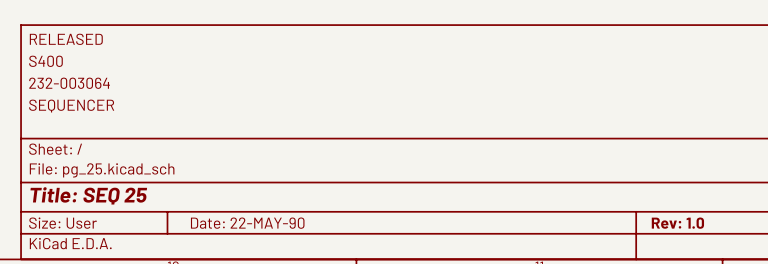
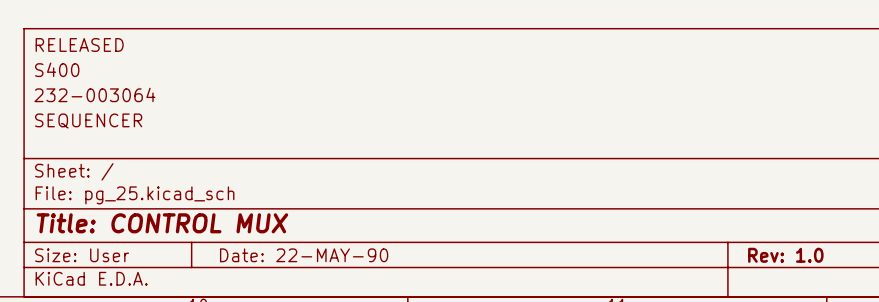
title block: Title: SEQ 25 (88, 195) -> Title: CONTROL MUX (162, 223)

